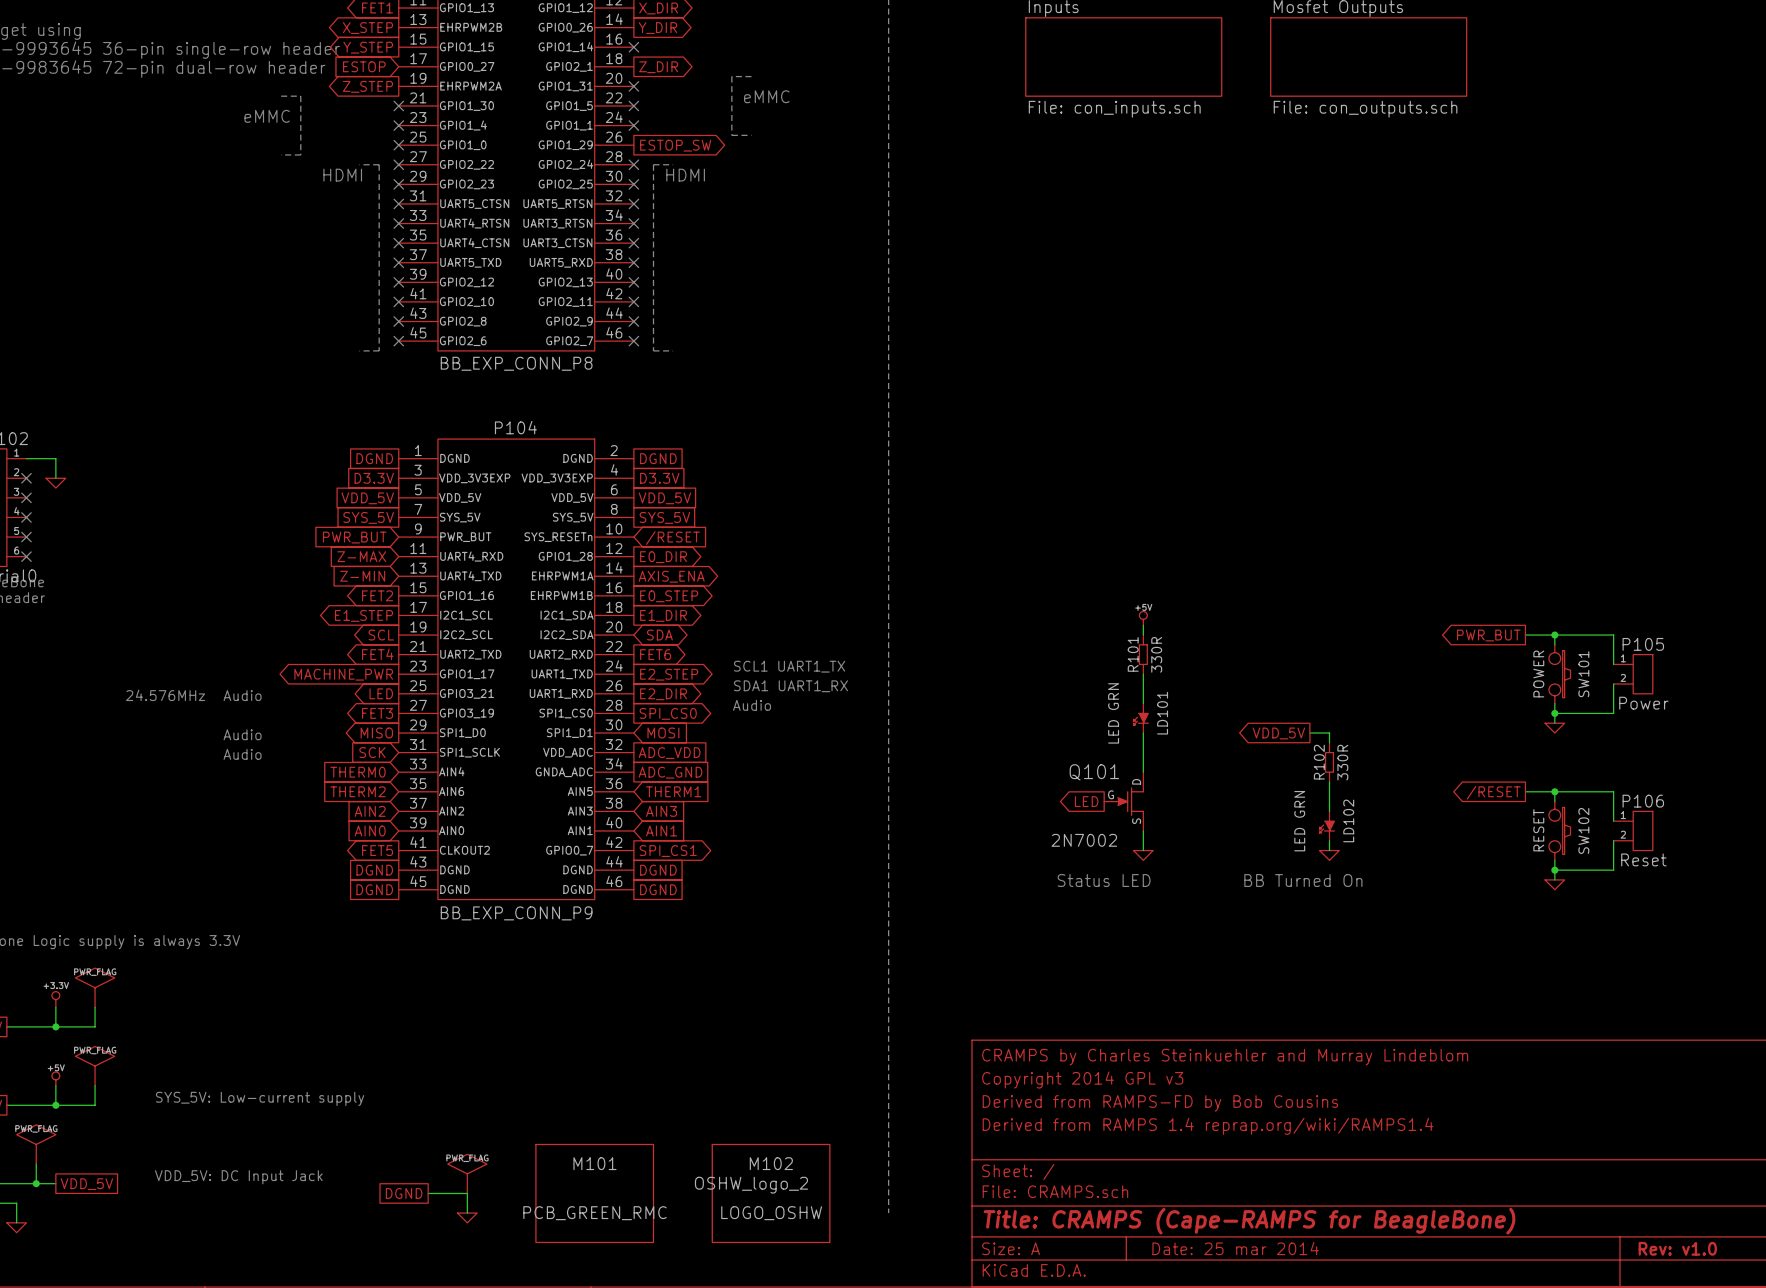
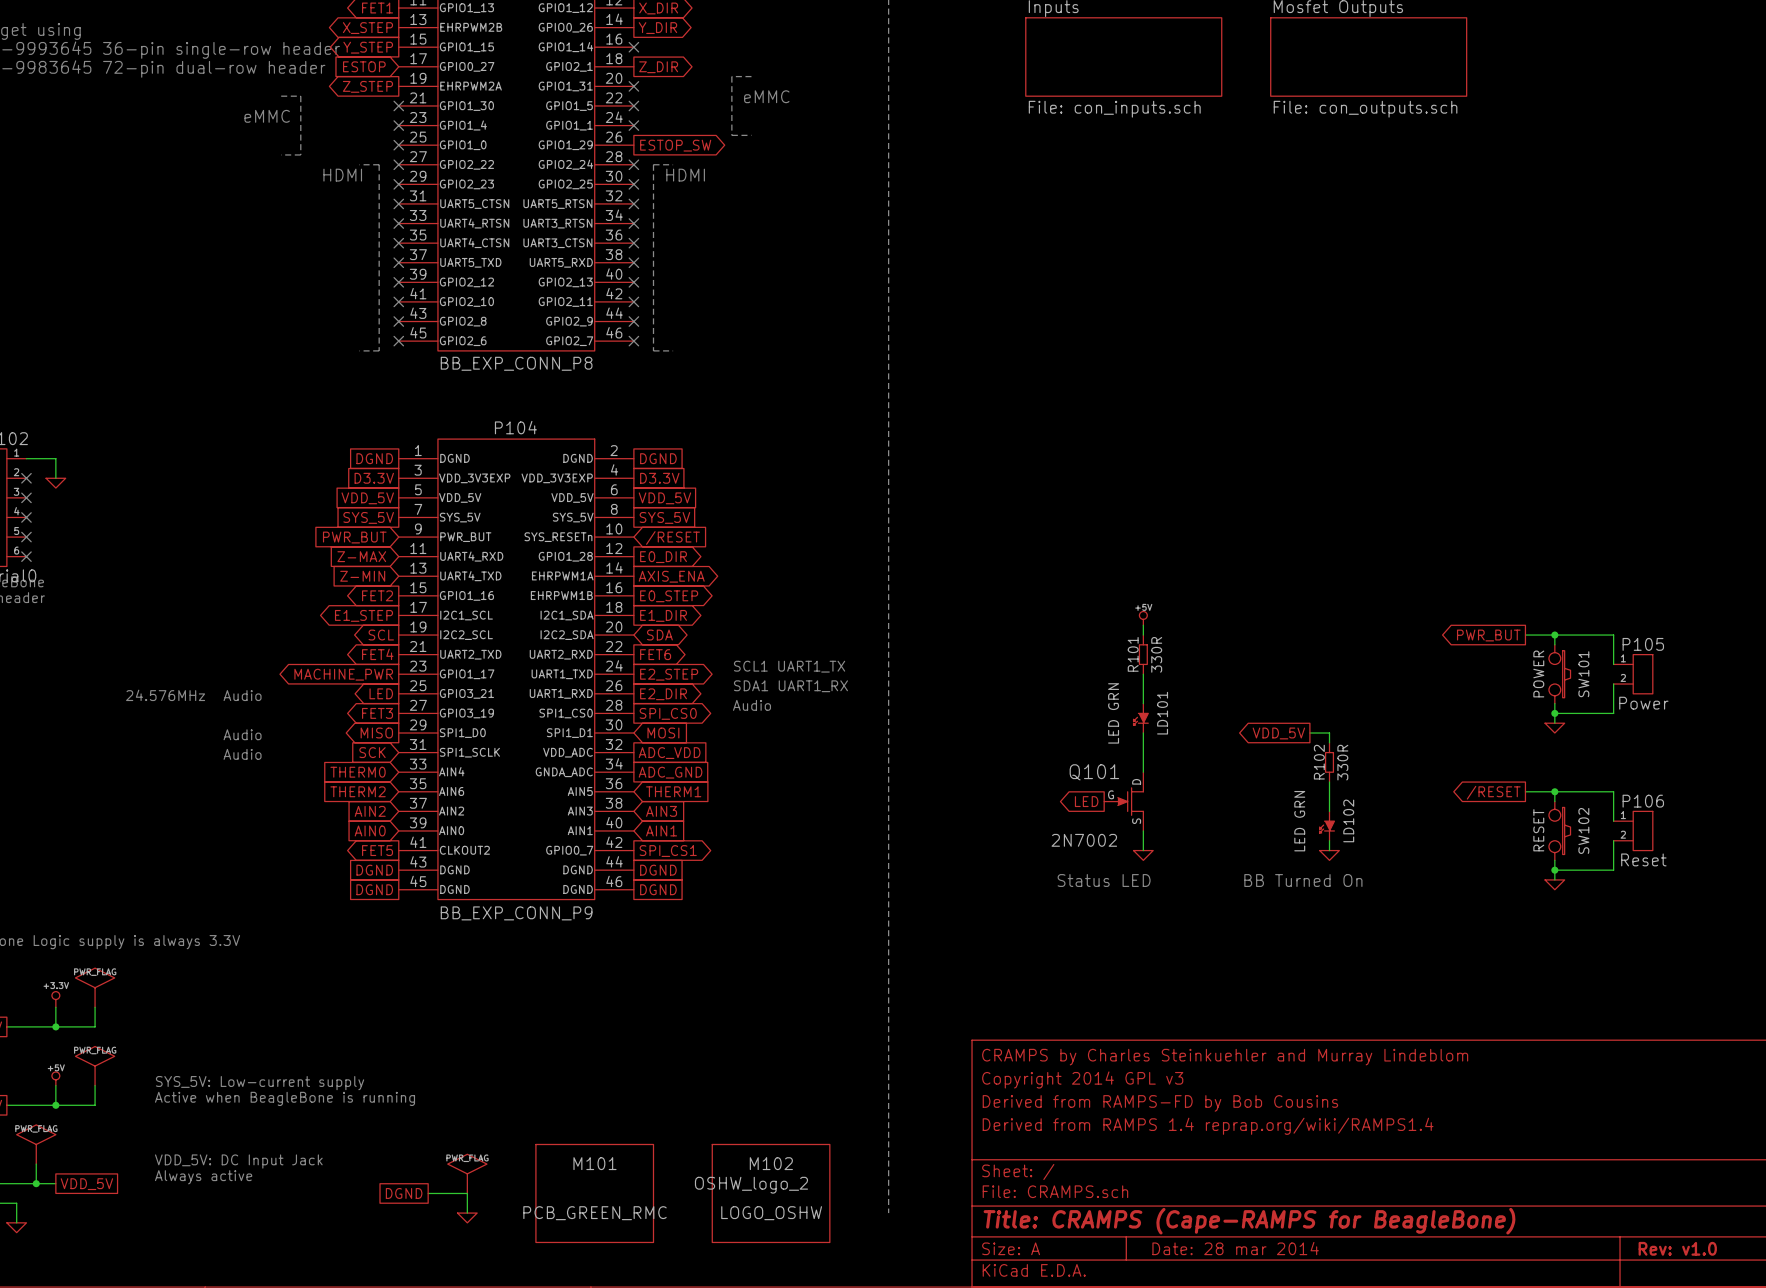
text: none -> SYS_5V: Low-current supply (260, 1083)
text: SYS_5V: Low-current supply (260, 1098) -> Active when BeagleBone is running (285, 1098)
text: none -> VDD_5V: DC Input Jack (238, 1161)
text: VDD_5V: DC Input Jack (238, 1177) -> Always active (203, 1177)
title block: Date: 25 mar 2014 (1235, 1248) -> Date: 28 mar 2014 (1235, 1248)

